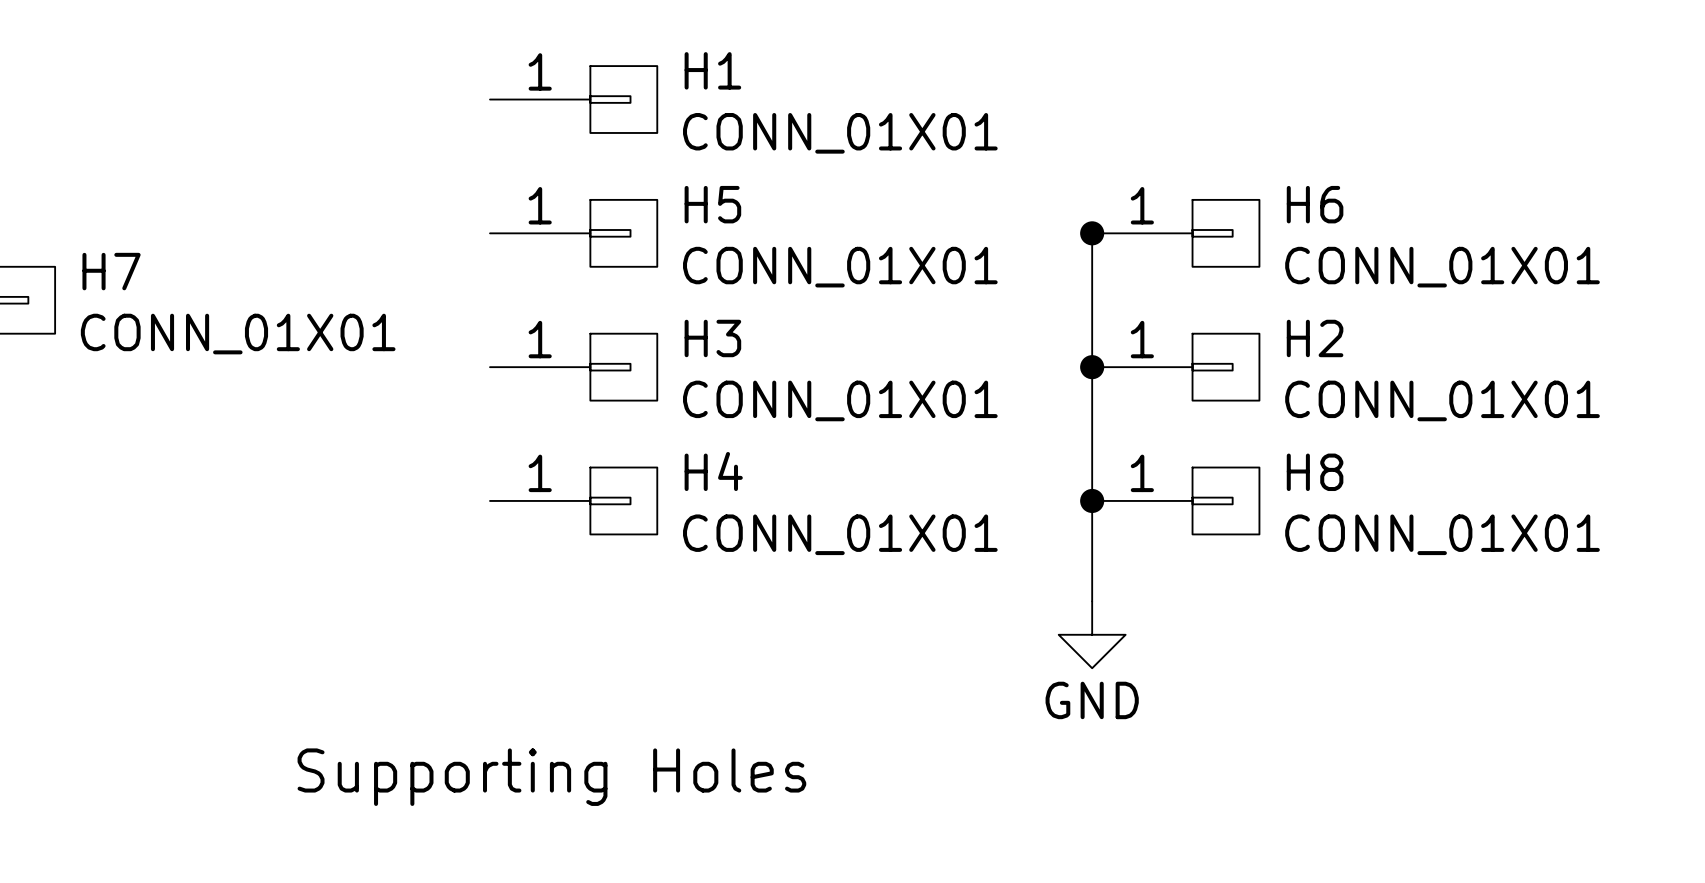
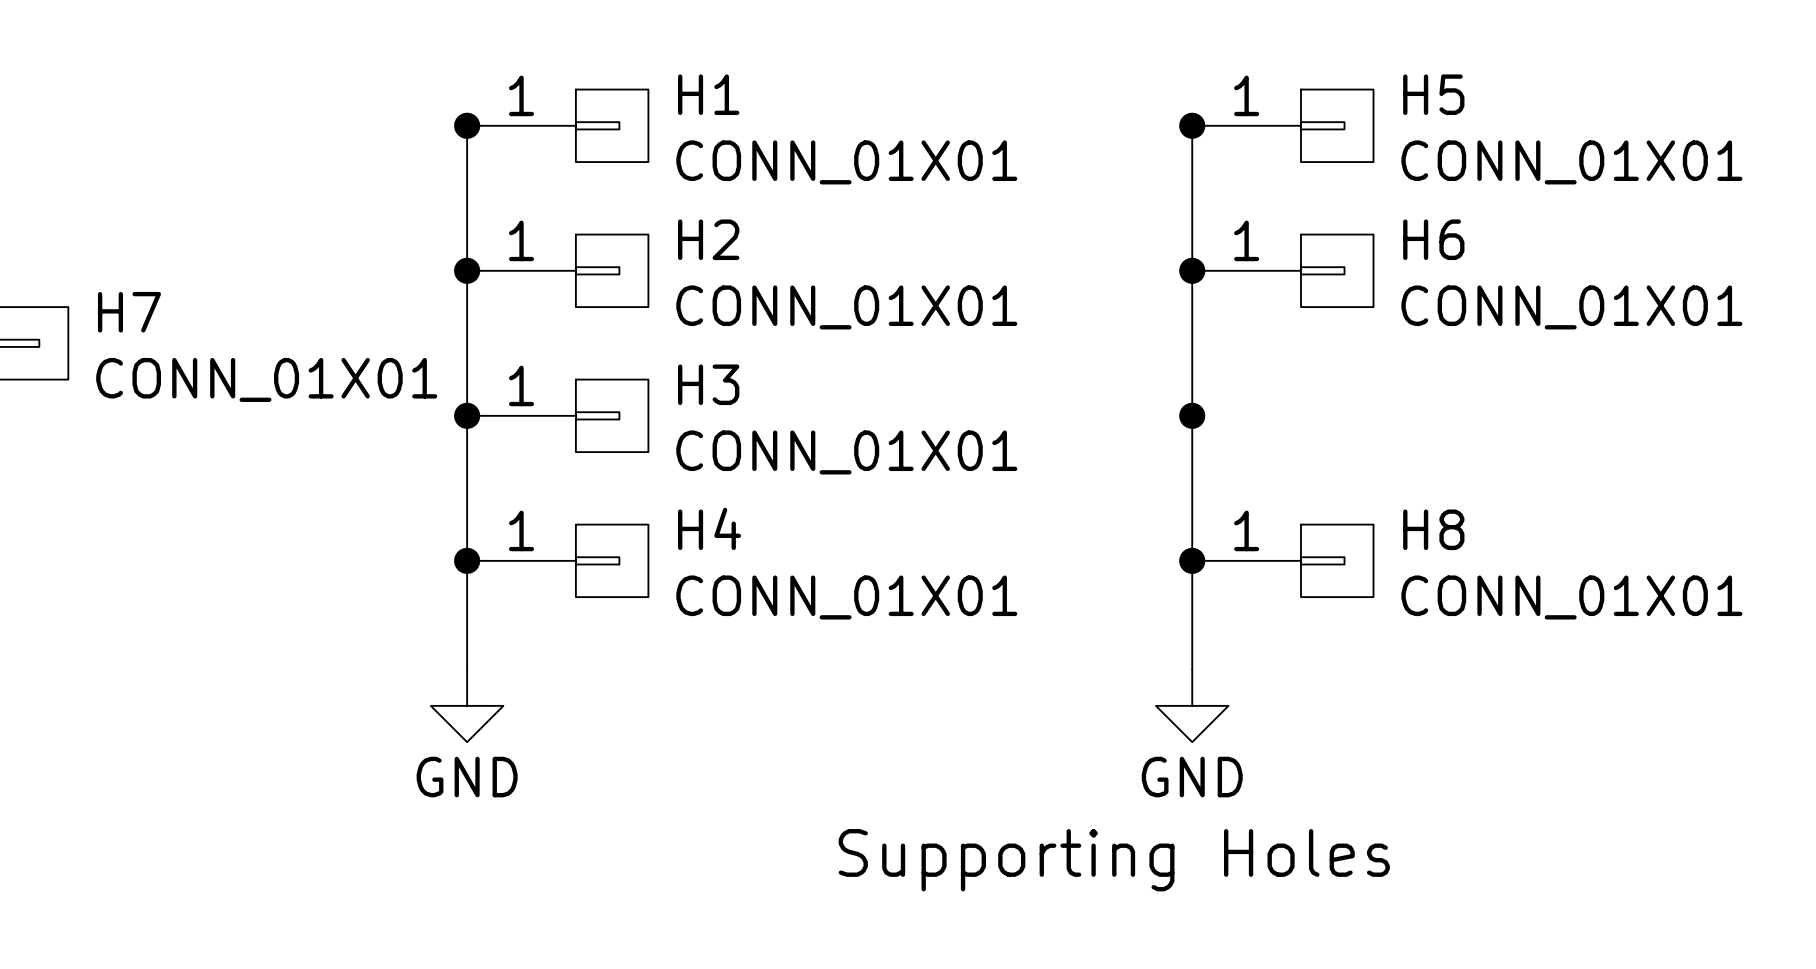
wire: none -> (467, 125) (467, 669)
junction: none -> (467, 125)
H1 position: (573, 99) -> (557, 125)
wire: none -> (1192, 125) (1192, 270)
junction: none -> (1192, 125)
junction: none -> (467, 270)
H5 position: (573, 233) -> (1282, 125)
junction: none -> (467, 415)
H3 position: (573, 367) -> (557, 415)
H2 position: (1175, 367) -> (557, 270)
junction: none -> (467, 560)
H4 position: (573, 500) -> (557, 560)
power symbol: none -> GND (467, 705)
text position: Supporting Holes (551, 777) -> Supporting Holes (1114, 860)

